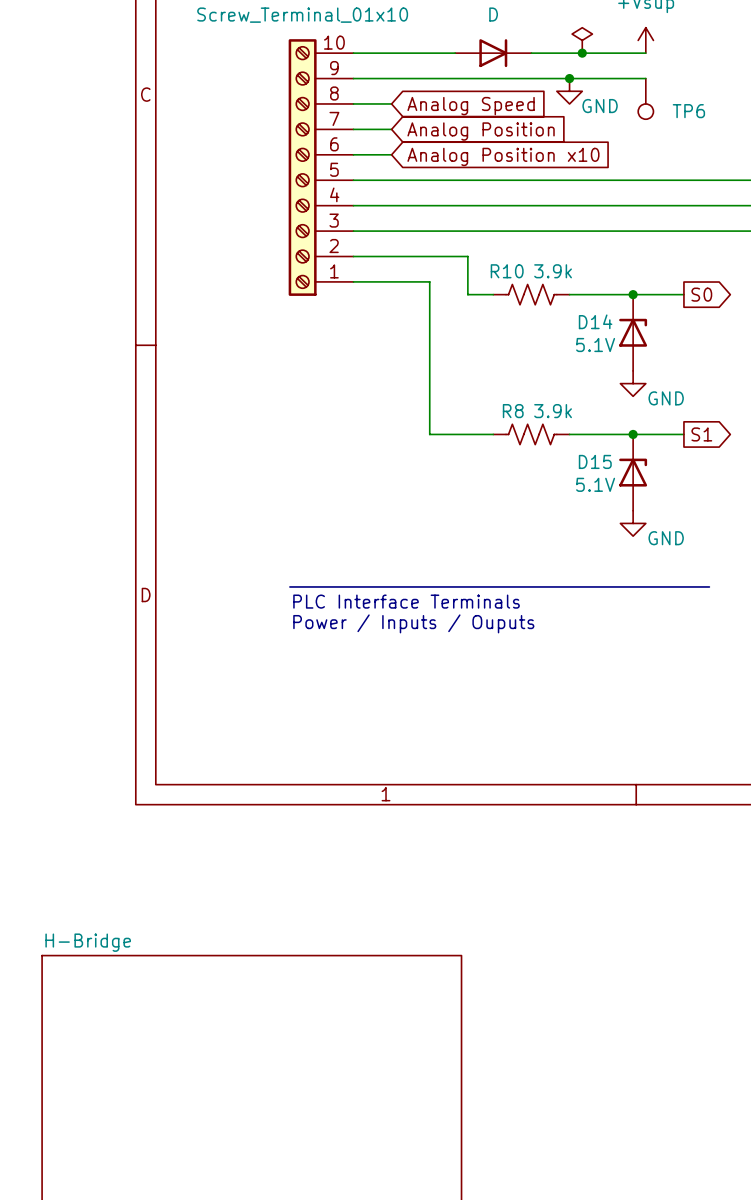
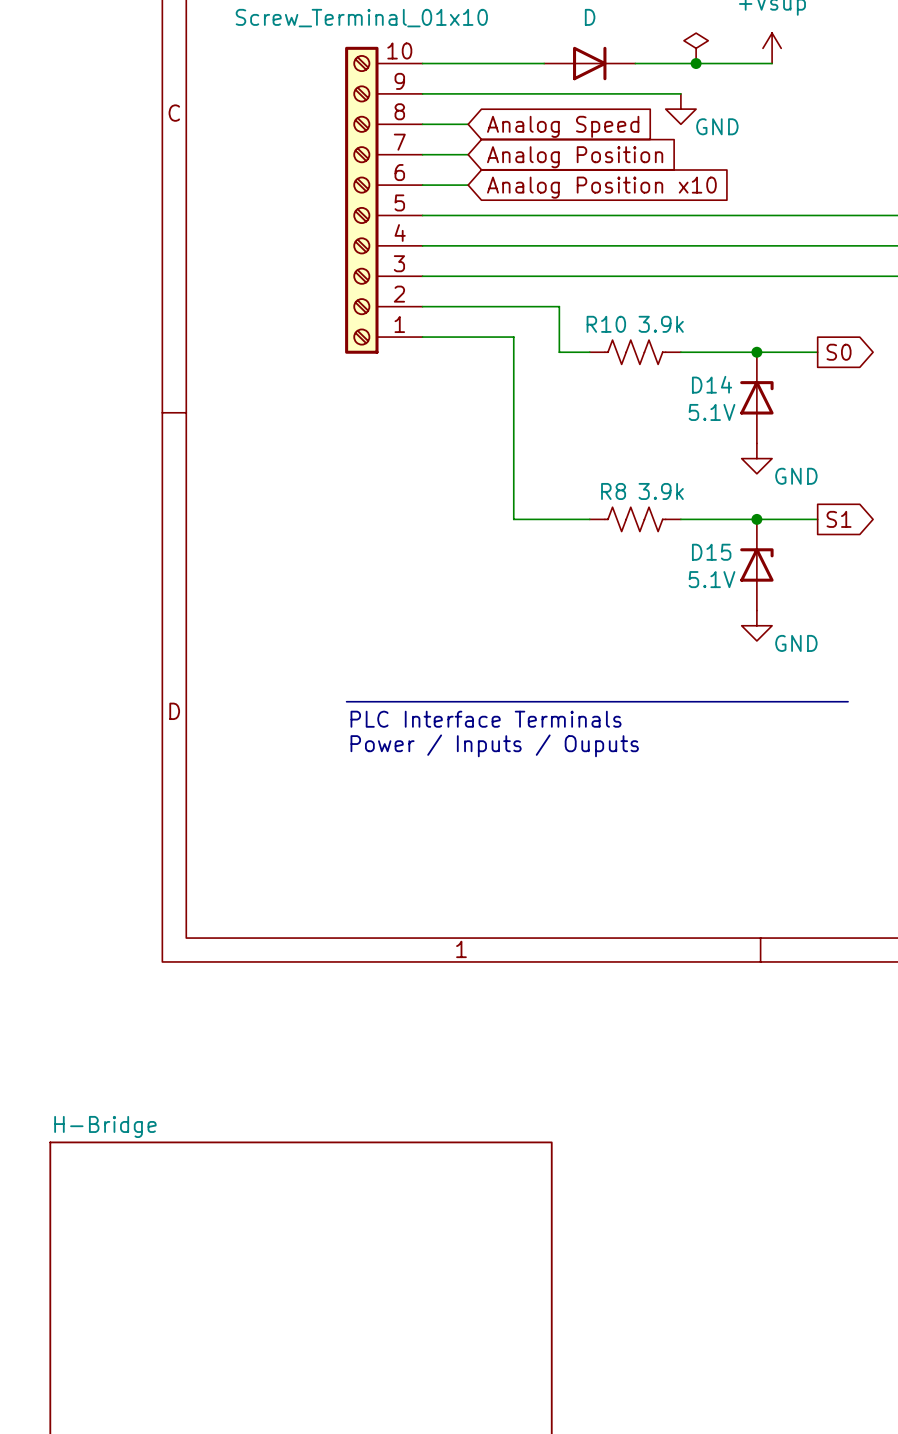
wire: (569, 78) (645, 78) -> none
junction: (569, 78) -> none
TP6: (645, 98) -> none

